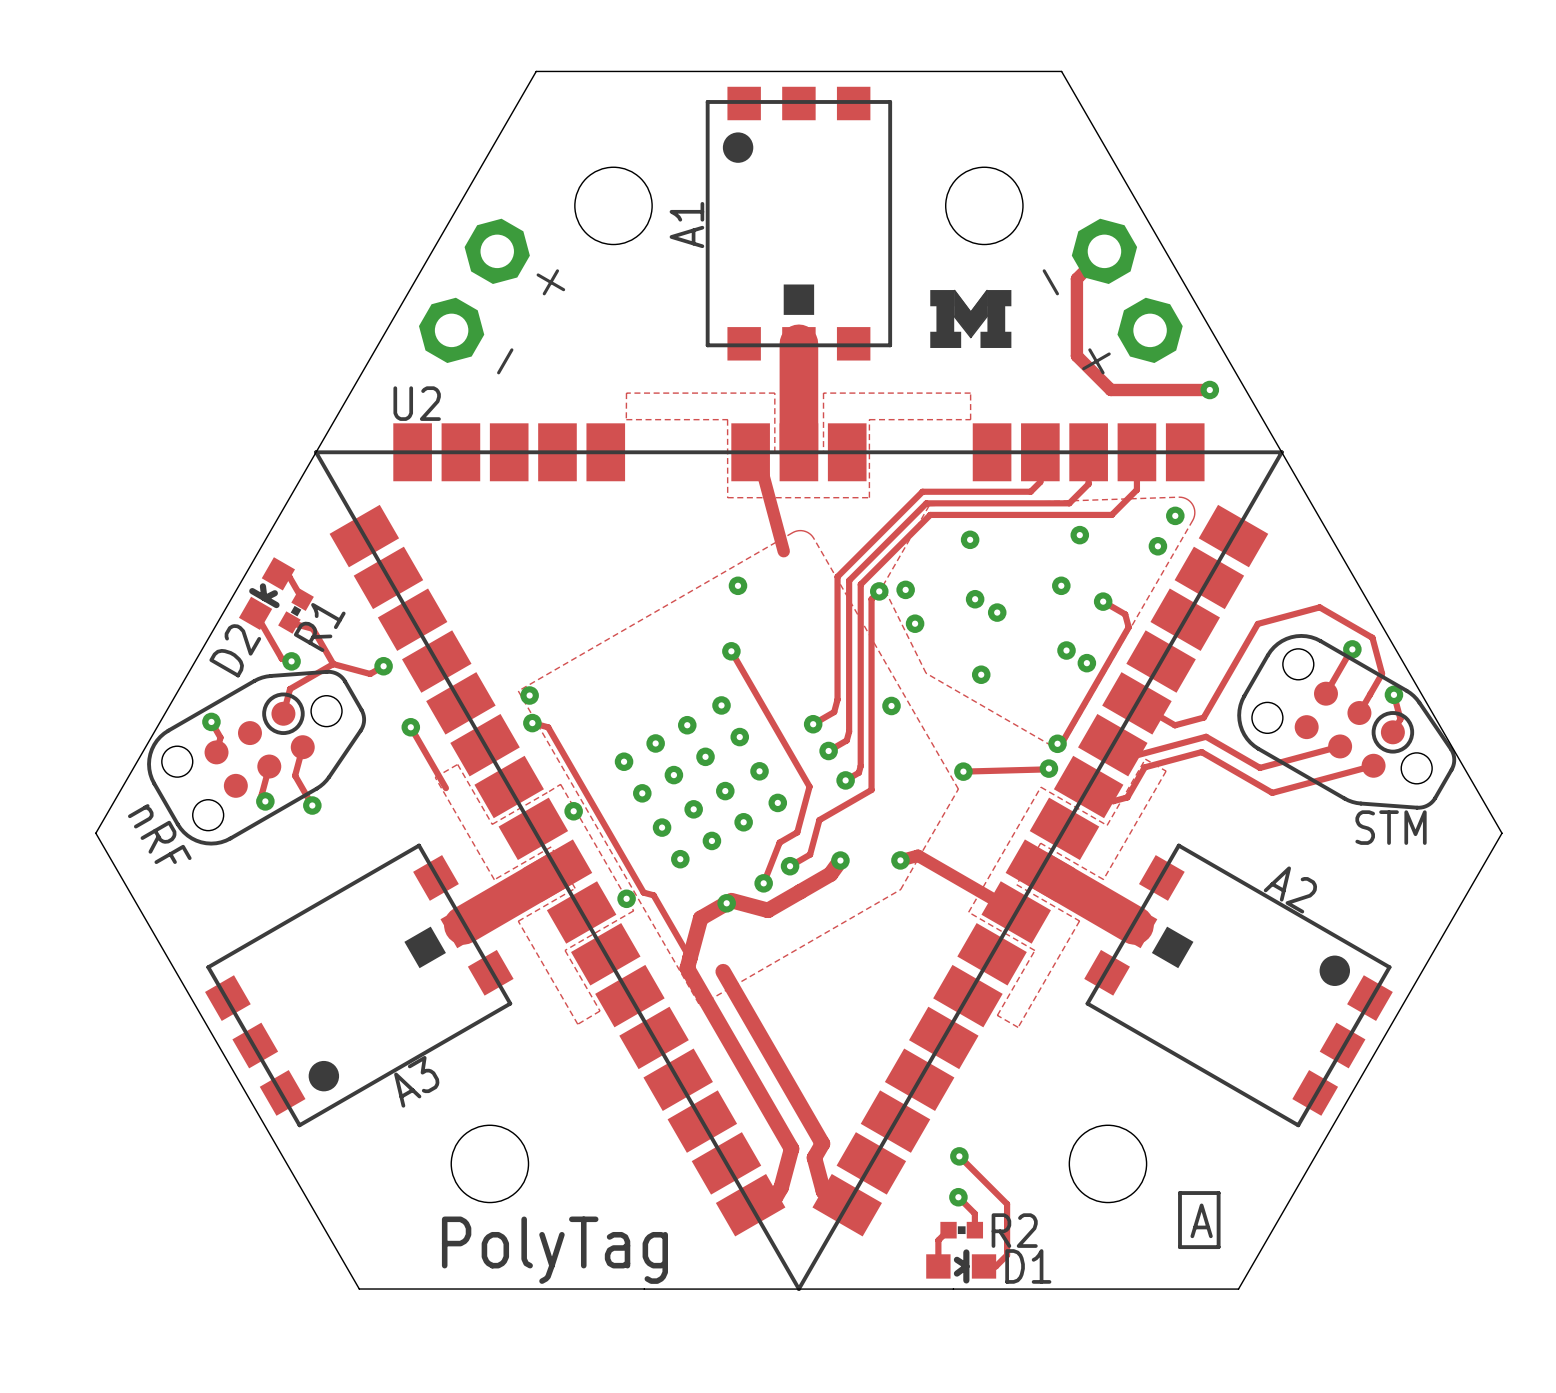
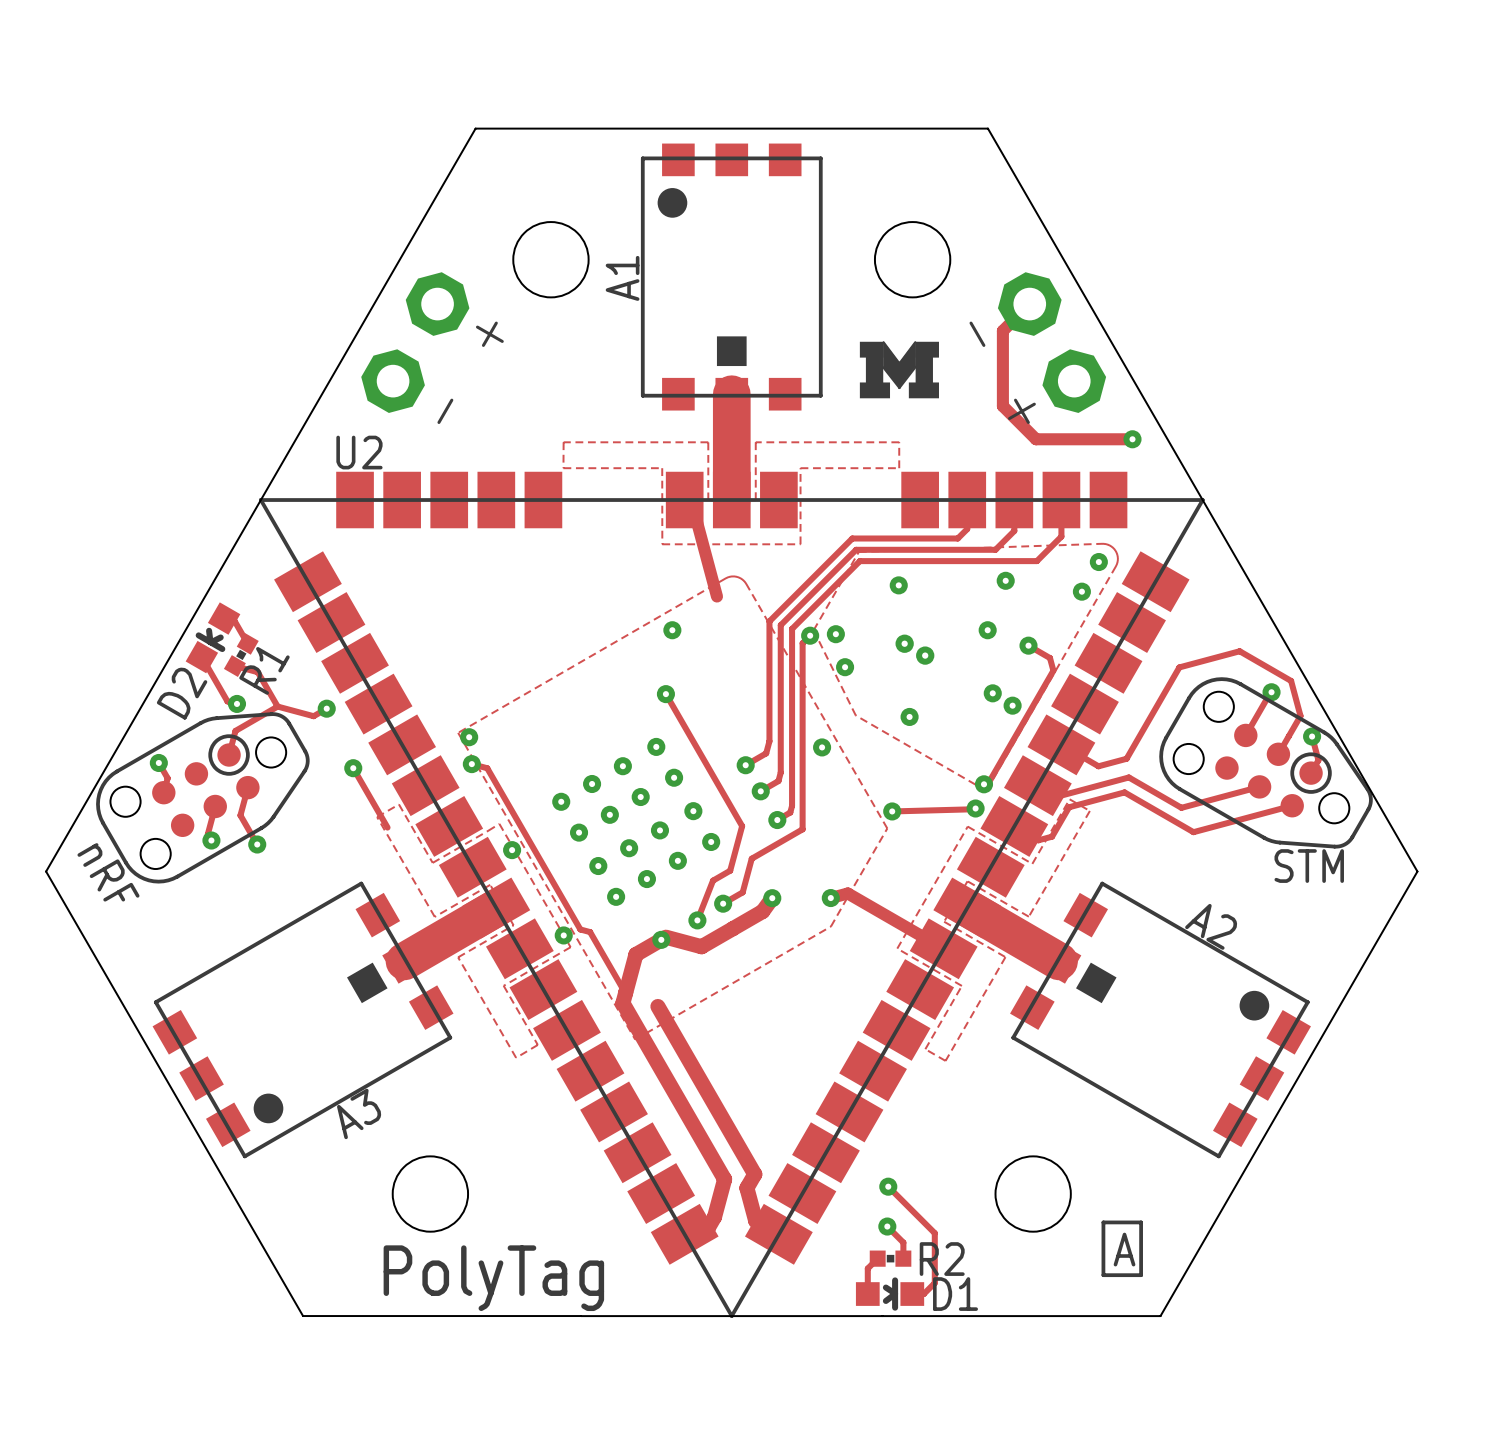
via: (975, 599) -> none
part: none -> (914, 649)
via: (997, 612) -> none

